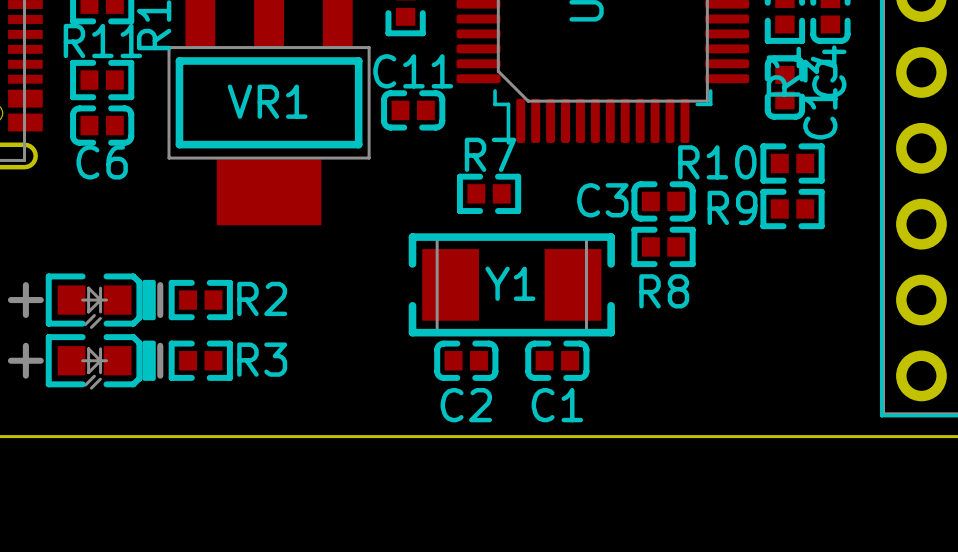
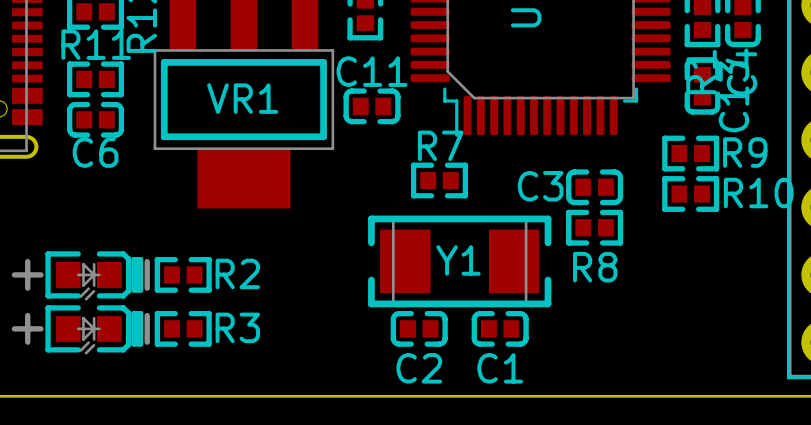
R10 name position: R10 (717, 162) -> R10 (758, 193)
R10 position: (792, 163) -> (690, 193)
R9 name position: R9 (732, 207) -> R9 (745, 152)
R9 position: (792, 209) -> (690, 153)

